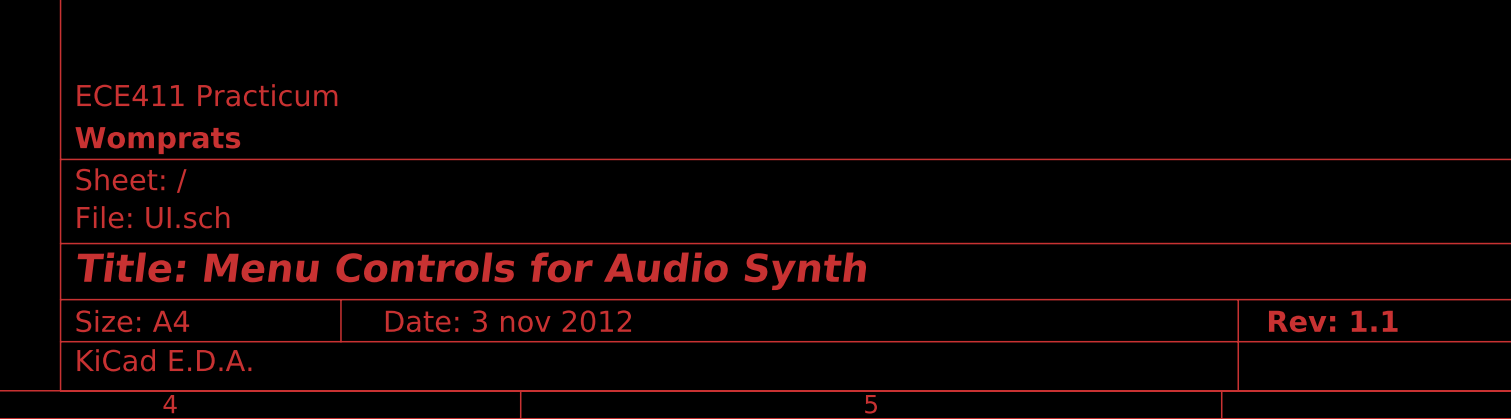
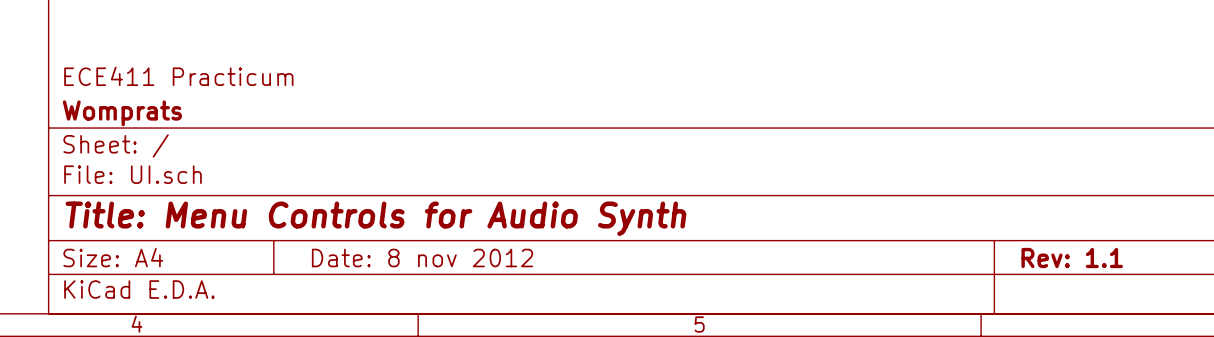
title block: Date: 3 nov 2012 (508, 321) -> Date: 8 nov 2012 (422, 258)

